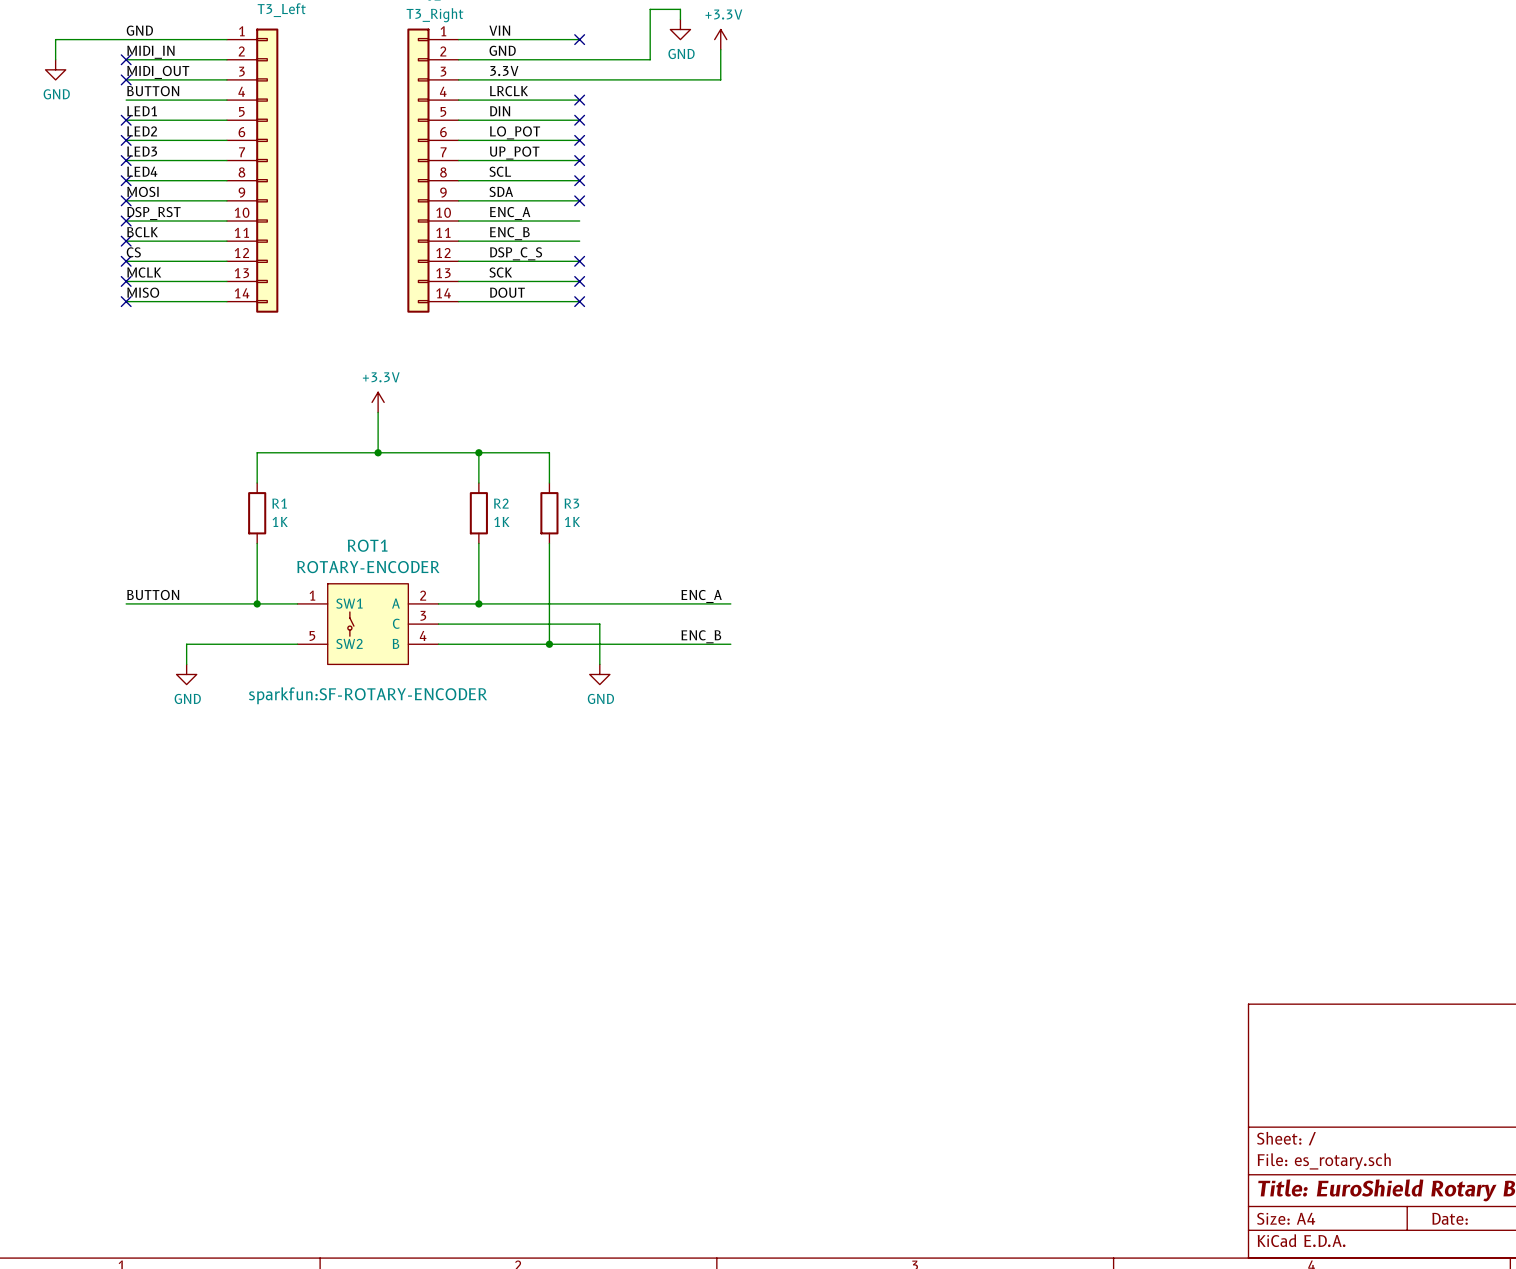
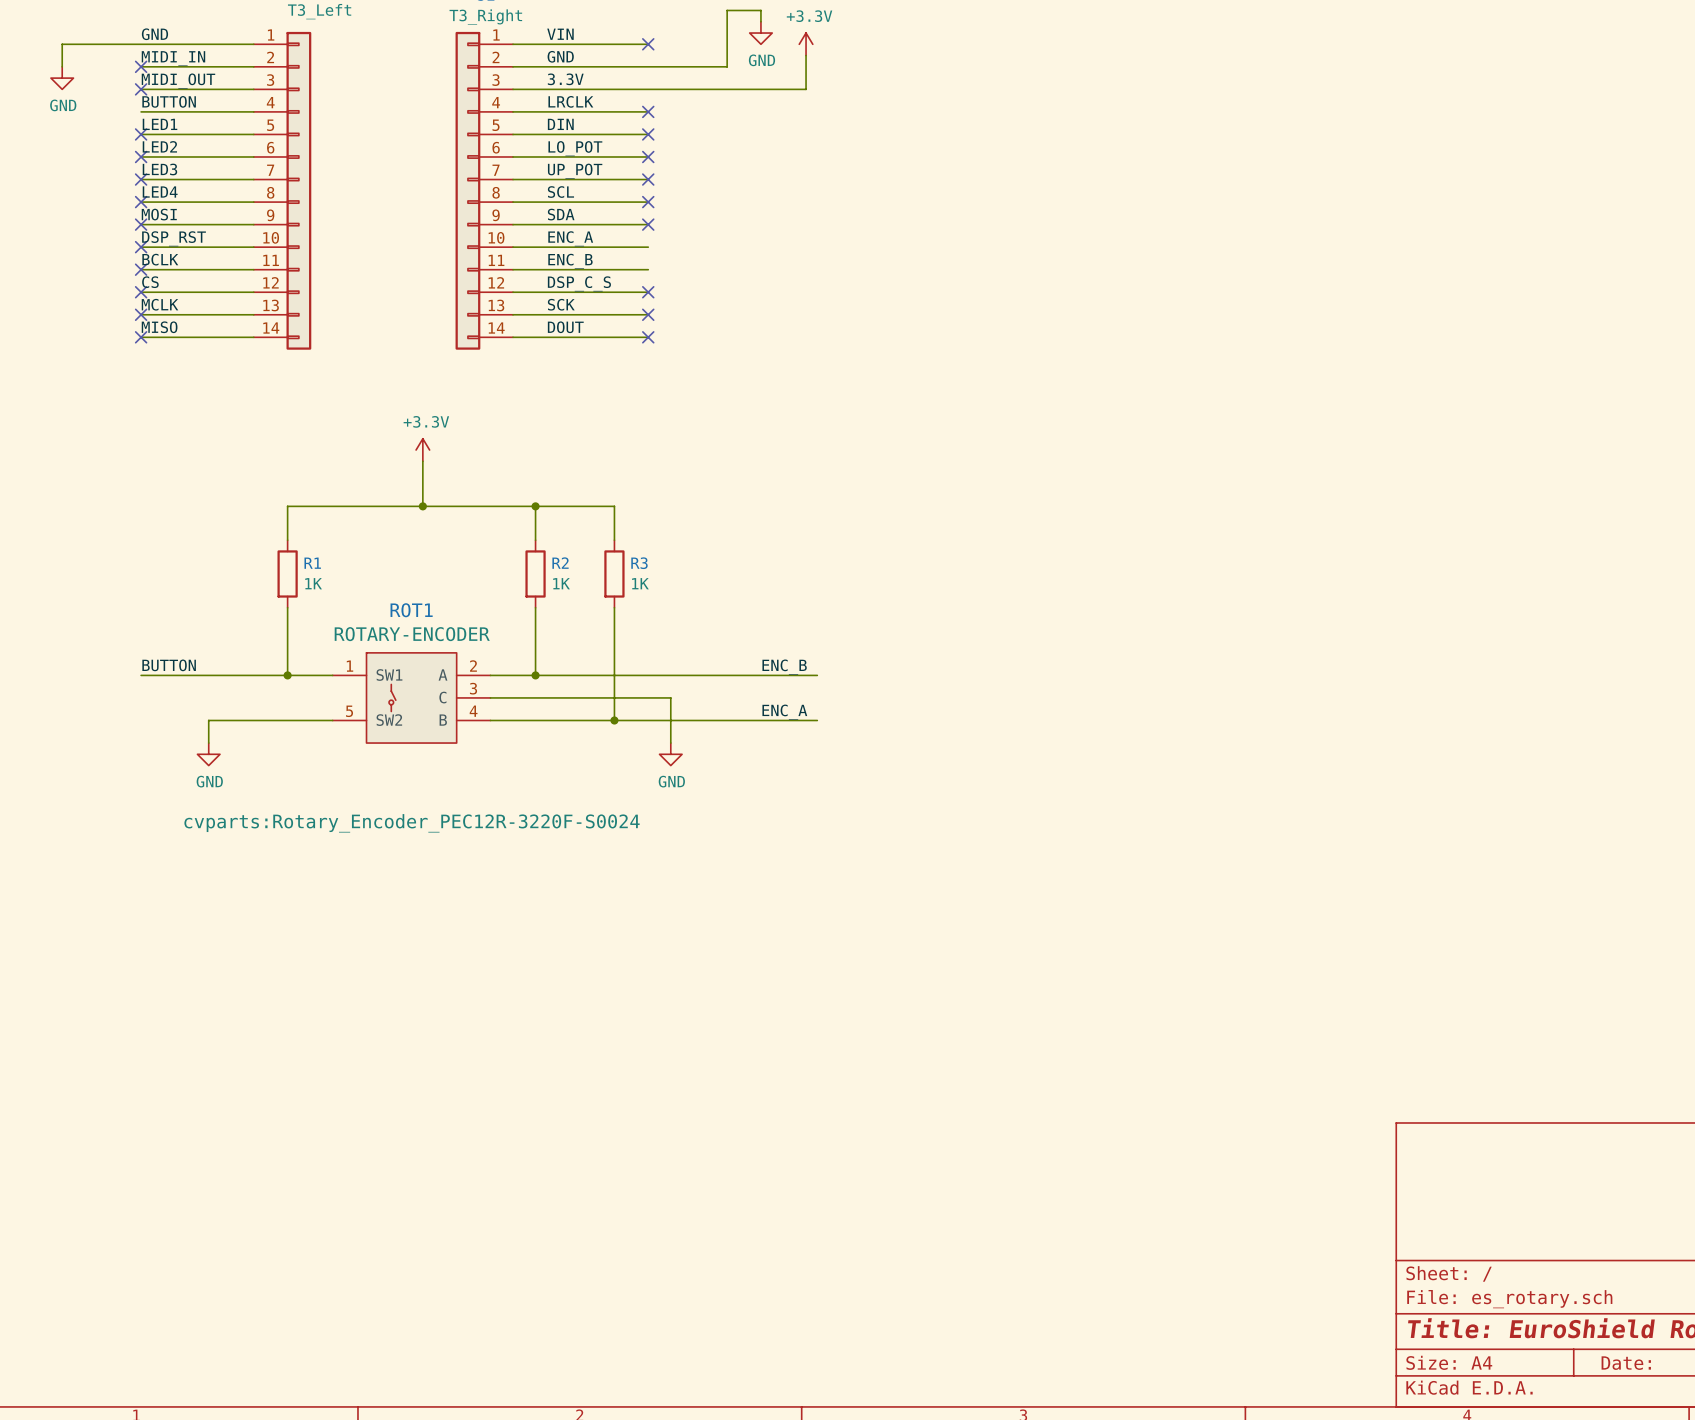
label: ENC_A (701, 596) -> ENC_B (784, 667)
label: ENC_B (701, 636) -> ENC_A (784, 712)
ROT1 text: sparkfun:SF-ROTARY-ENCODER (368, 695) -> cvparts:Rotary_Encoder_PEC12R-3220F-S0024 (412, 823)

